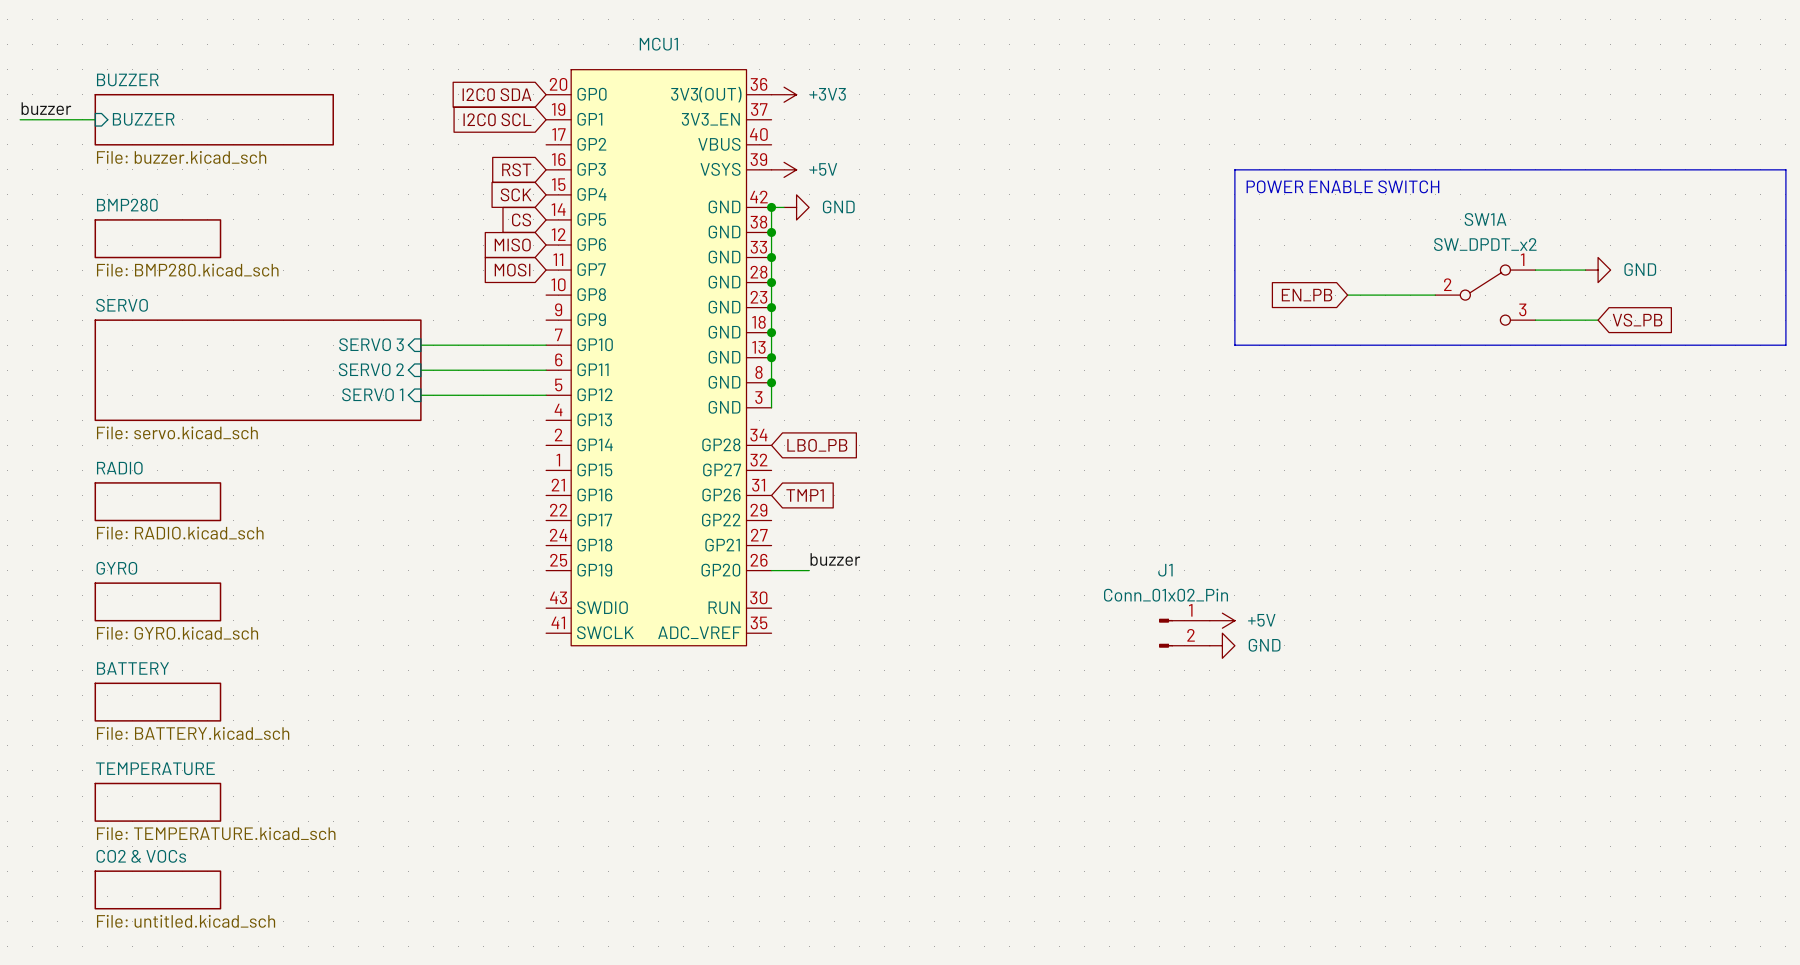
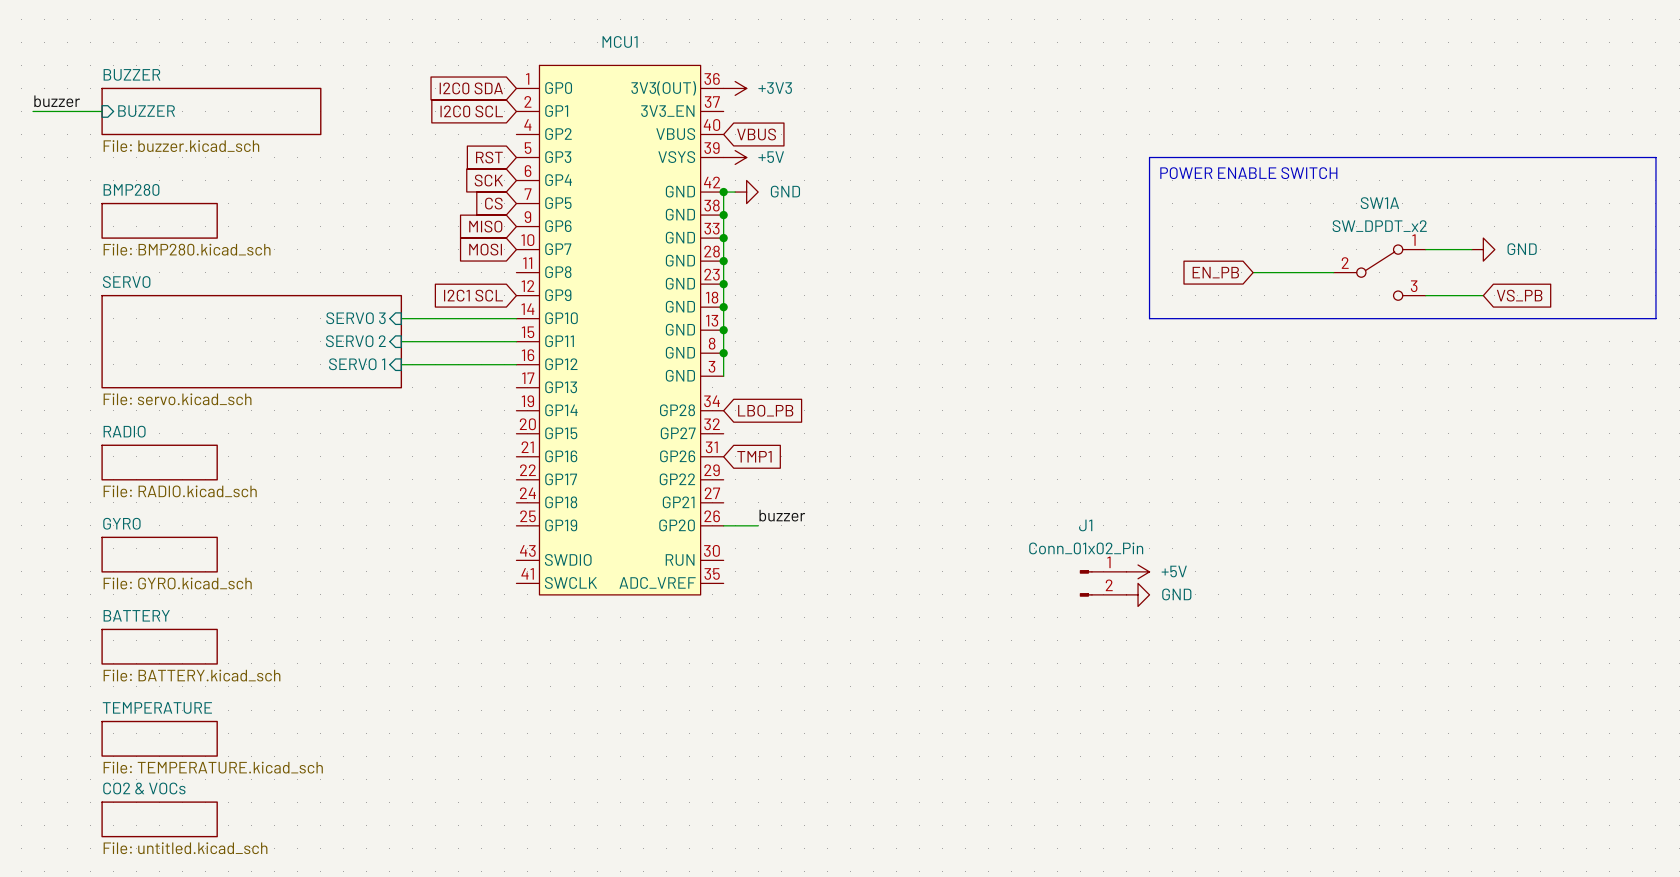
MCU1 symbol: [546, 69, 772, 646] -> [516, 65, 724, 595]
global label: none -> VBUS (756, 134)
global label: none -> I2C1 SCL (473, 295)

